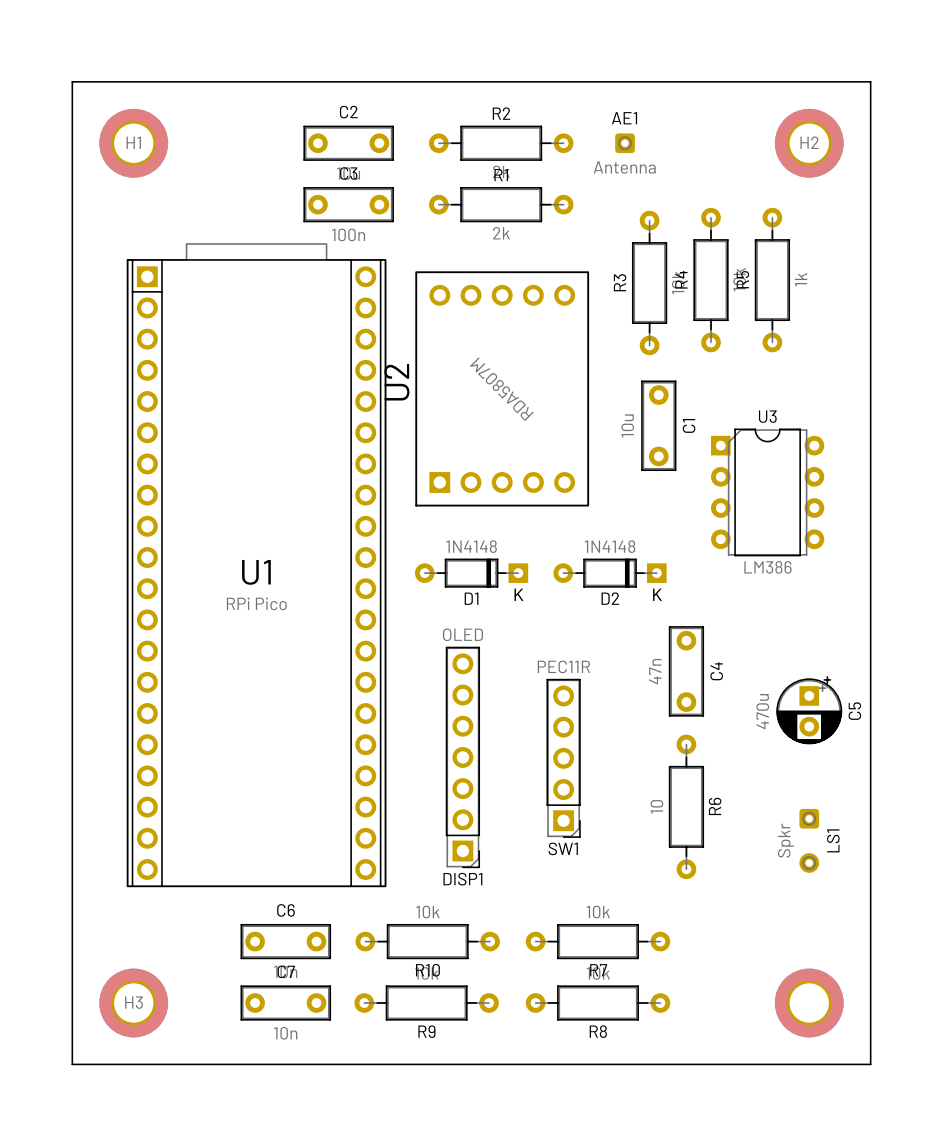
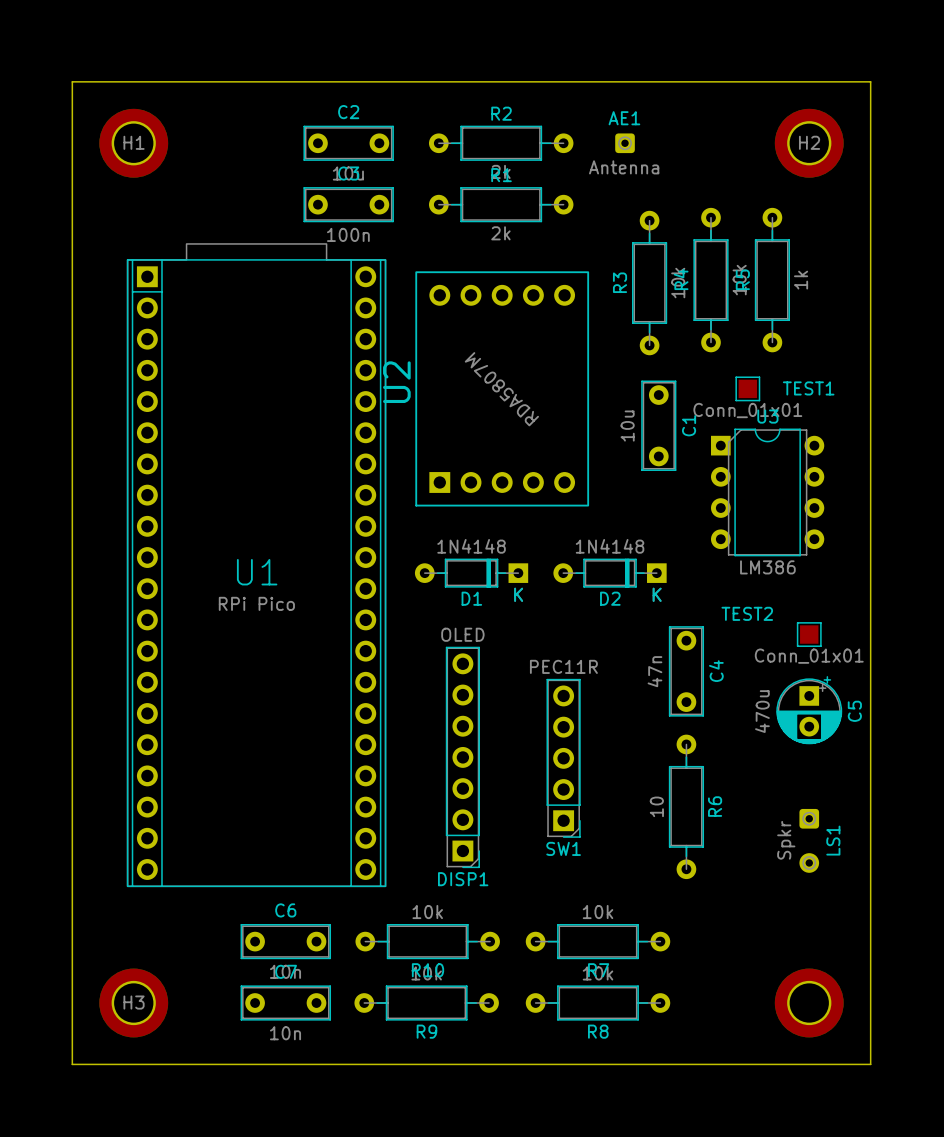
TEST1: none -> Conn_01x01 (747, 388)
TEST2: none -> Conn_01x01 (809, 634)

